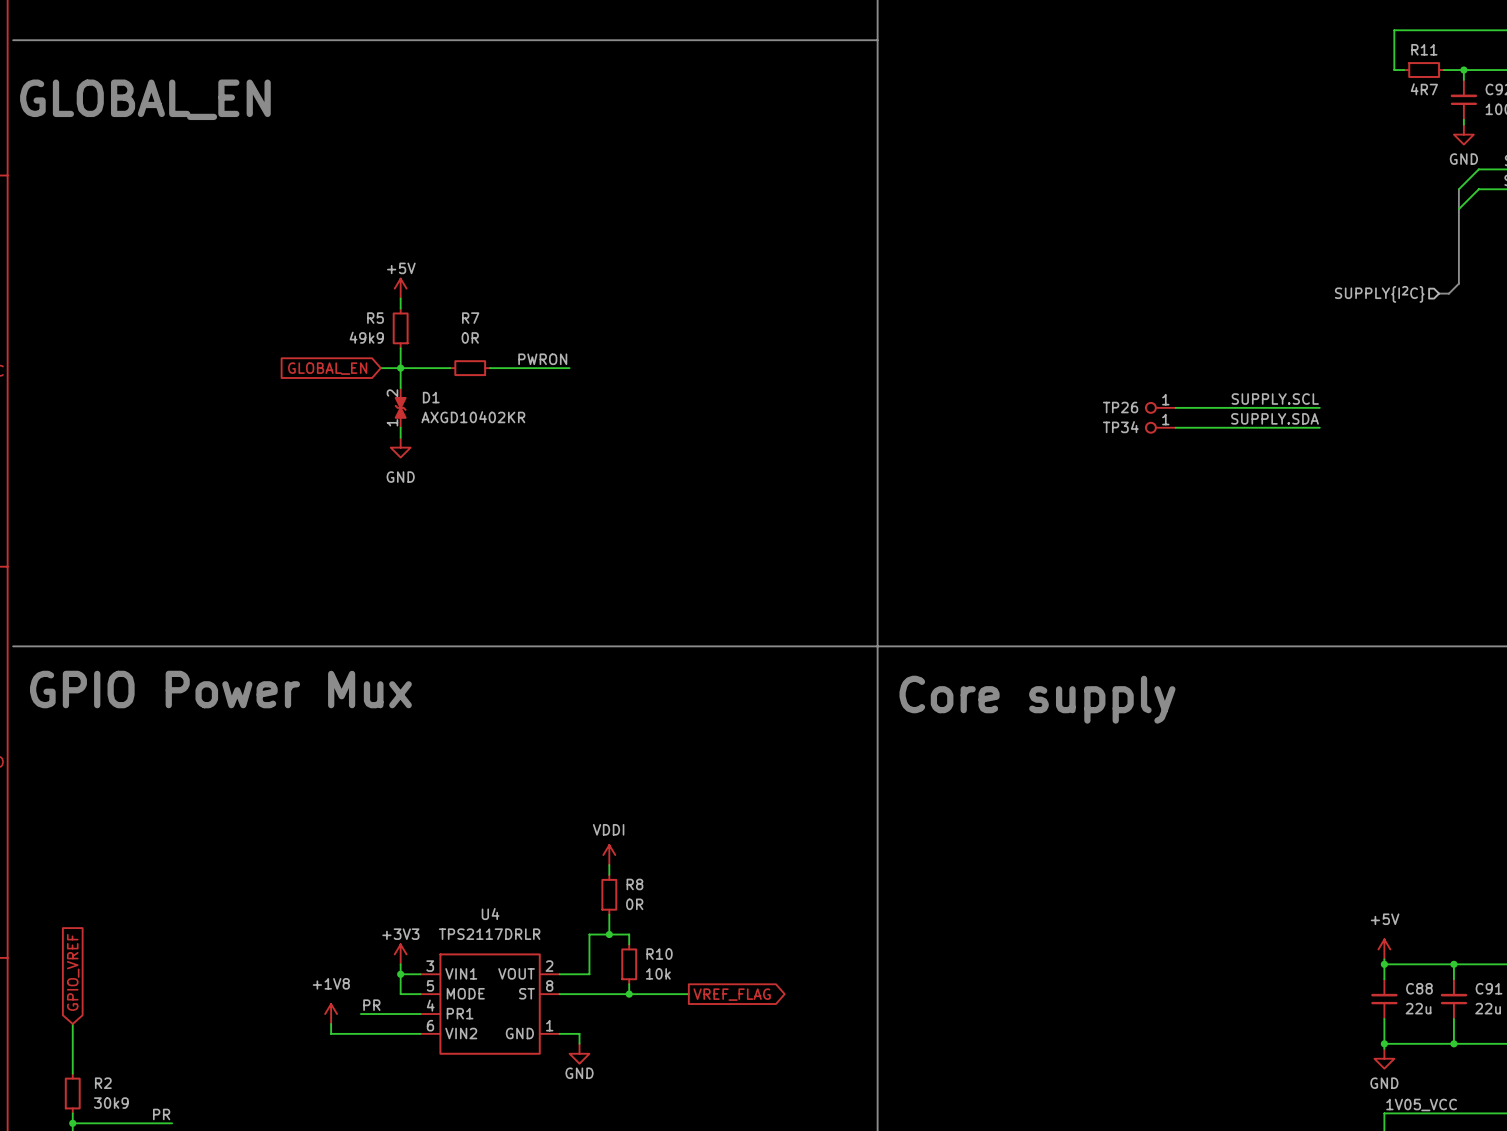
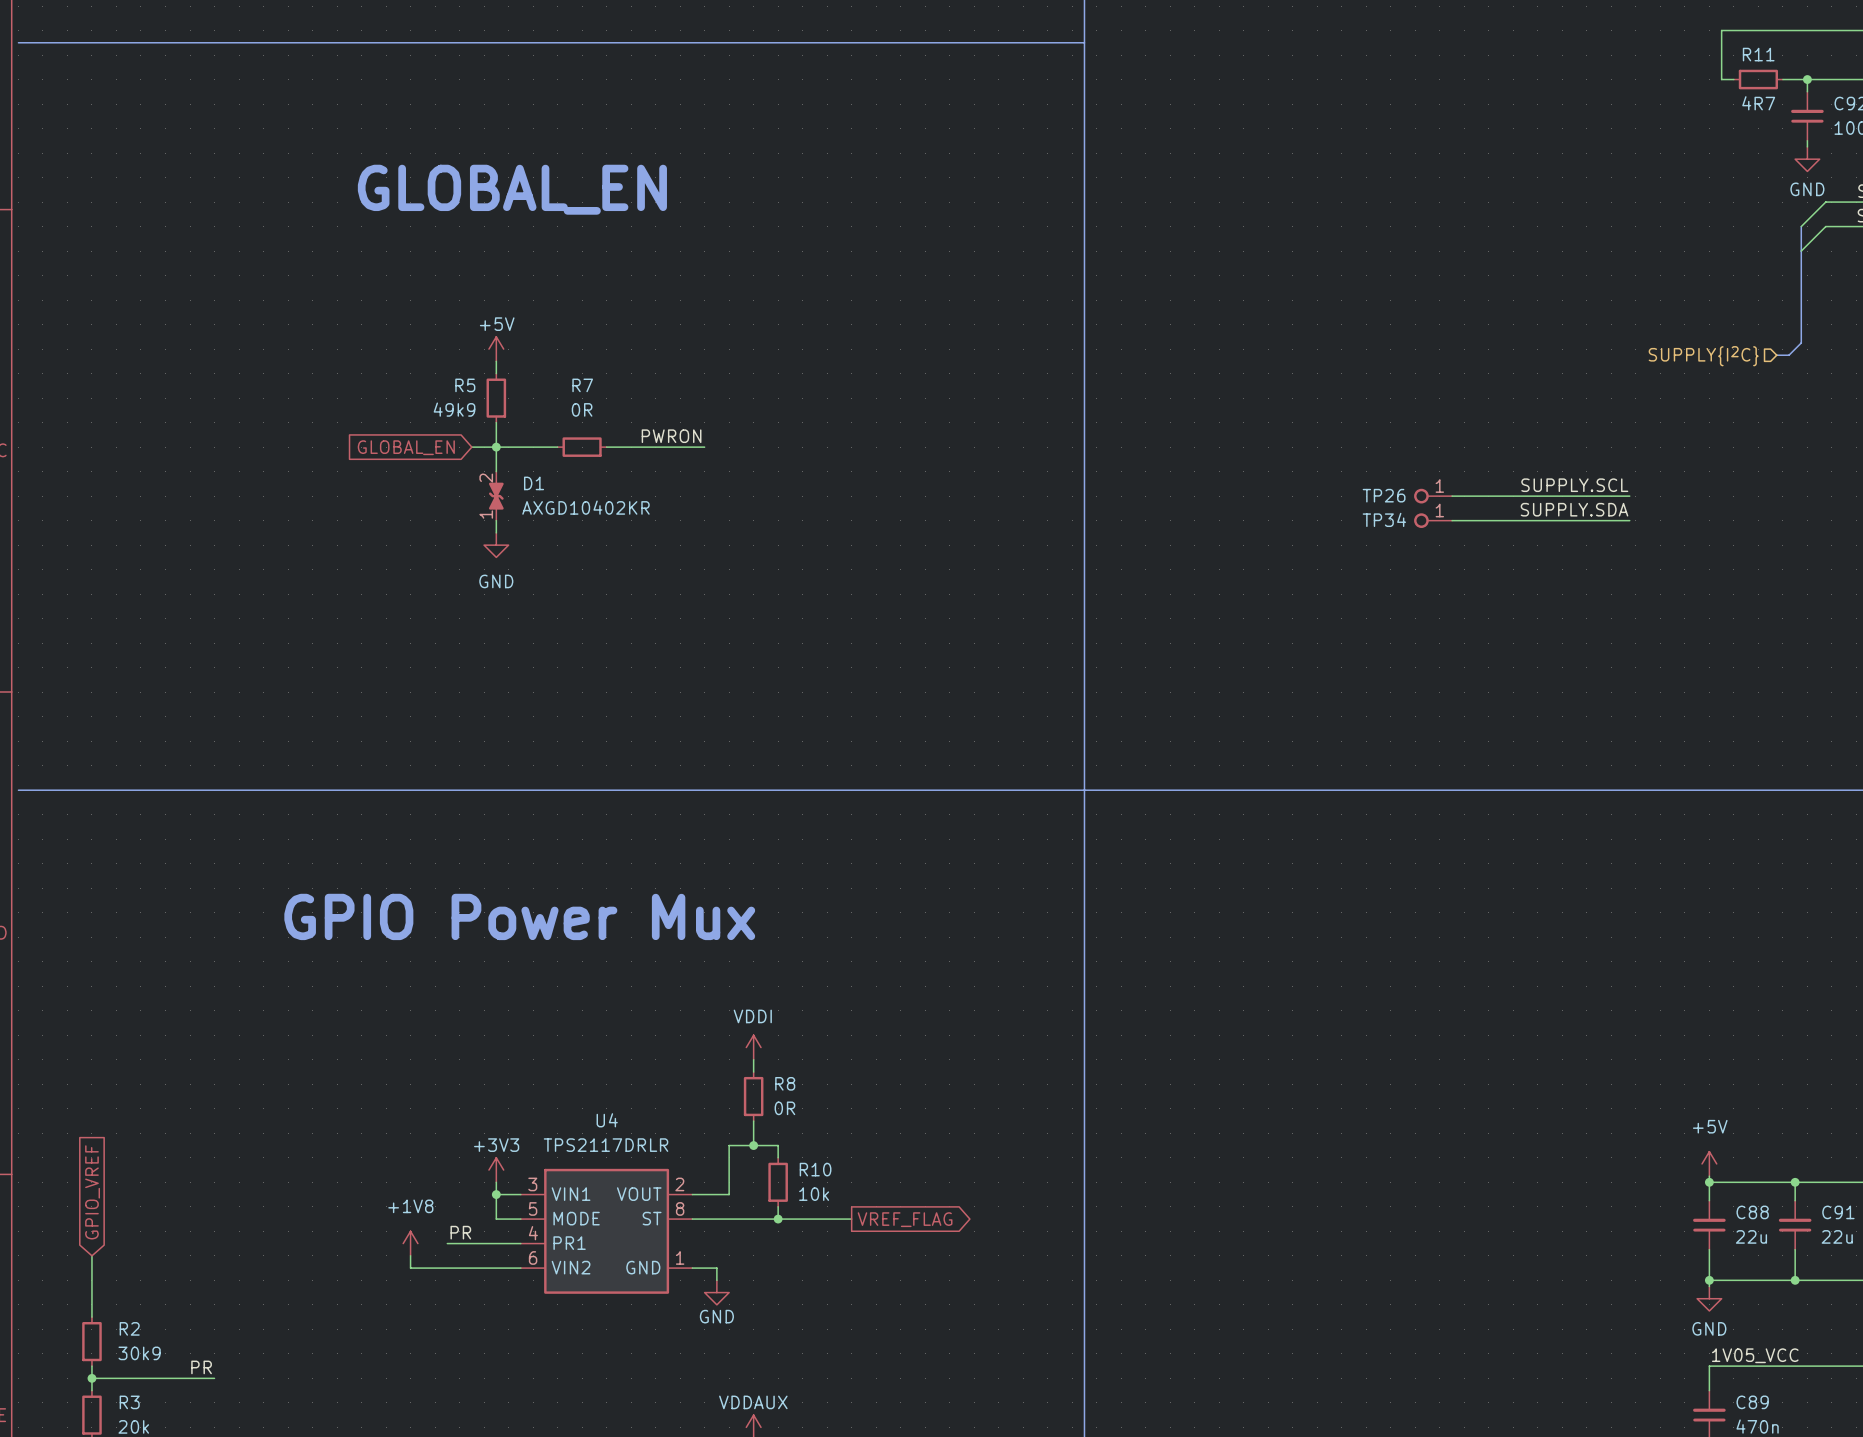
text: GLOBAL_EN (145, 99) -> none
text: none -> GLOBAL_EN (512, 189)
text: GPIO Power Mux (220, 689) -> none
text: Core supply (1037, 699) -> none
text: none -> GPIO Power Mux (519, 916)

